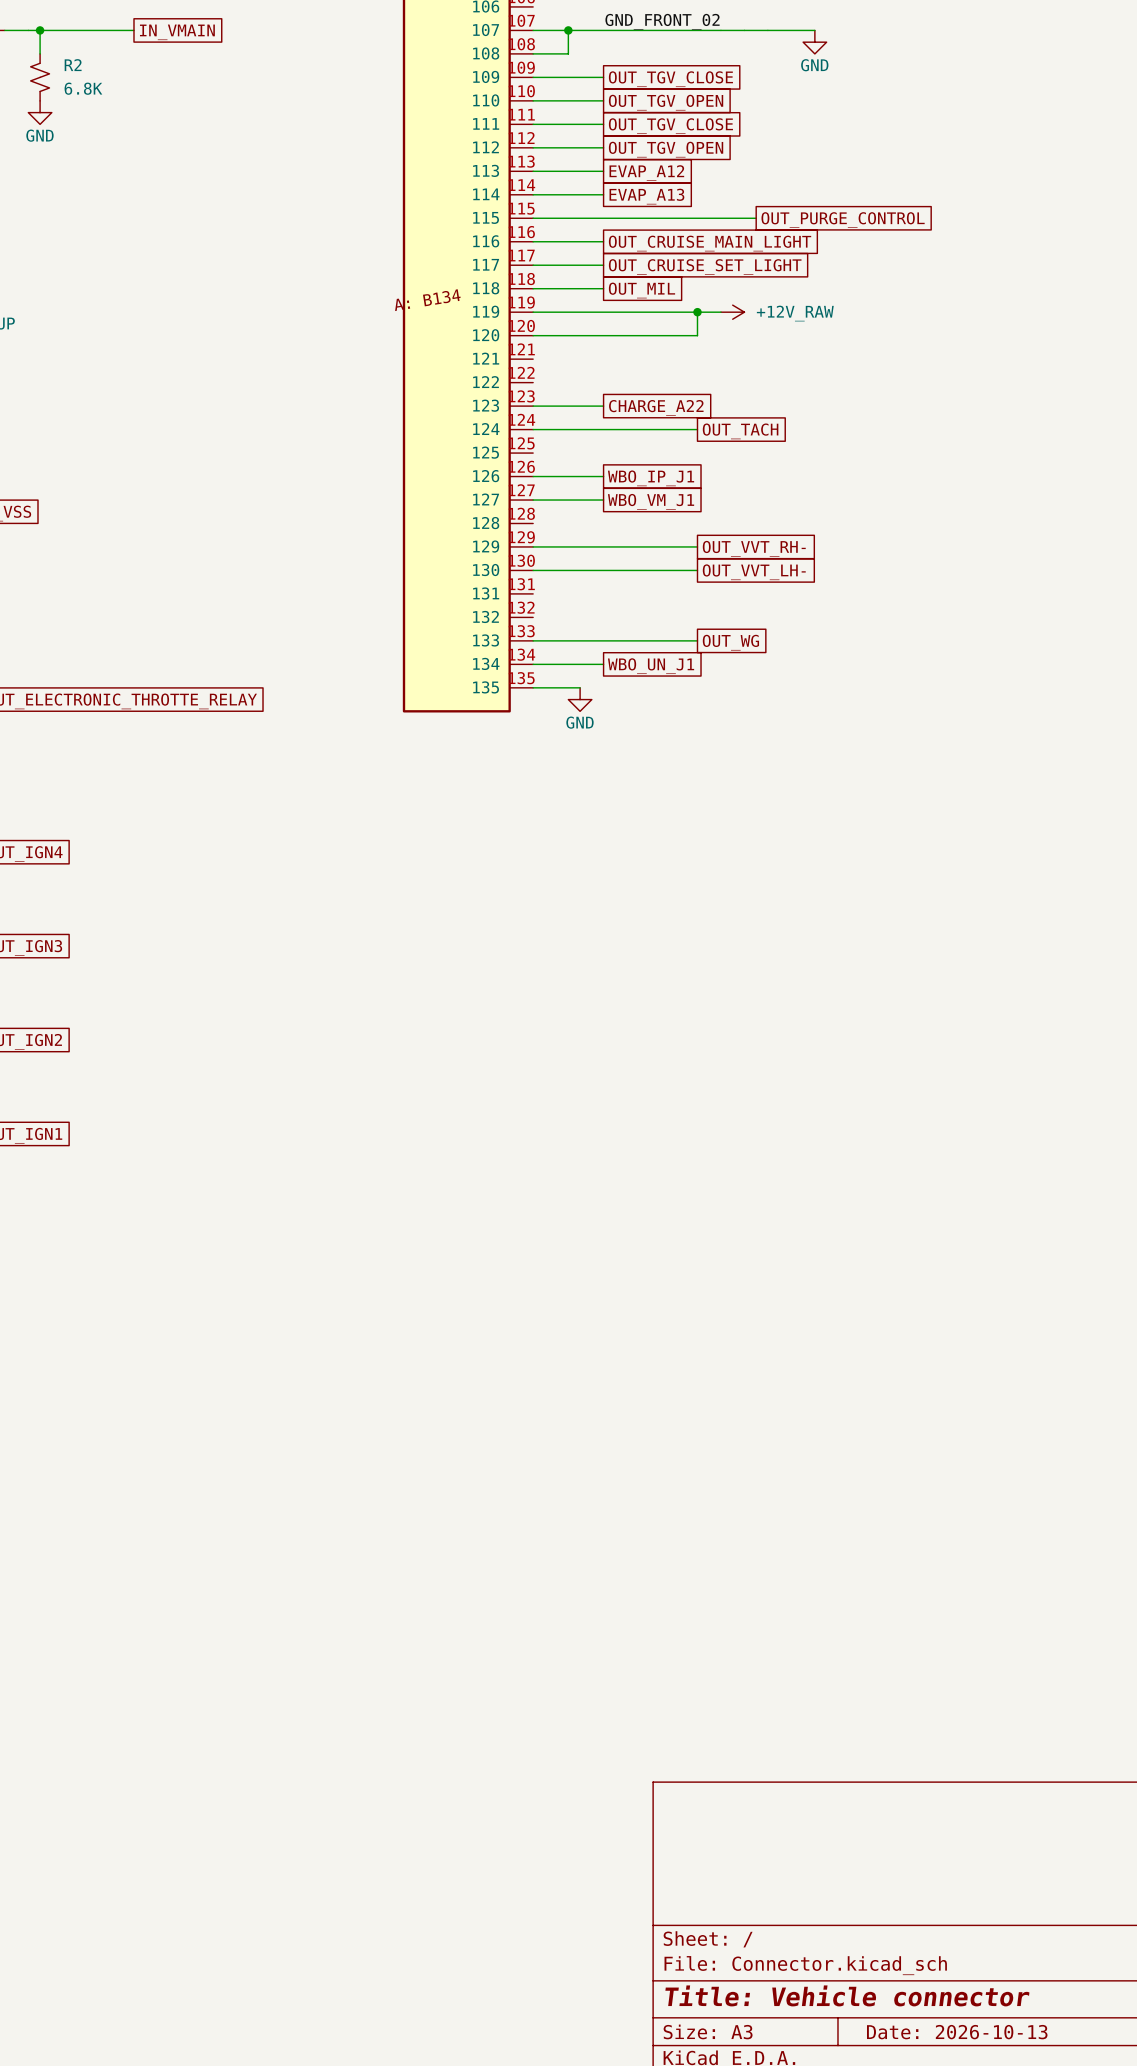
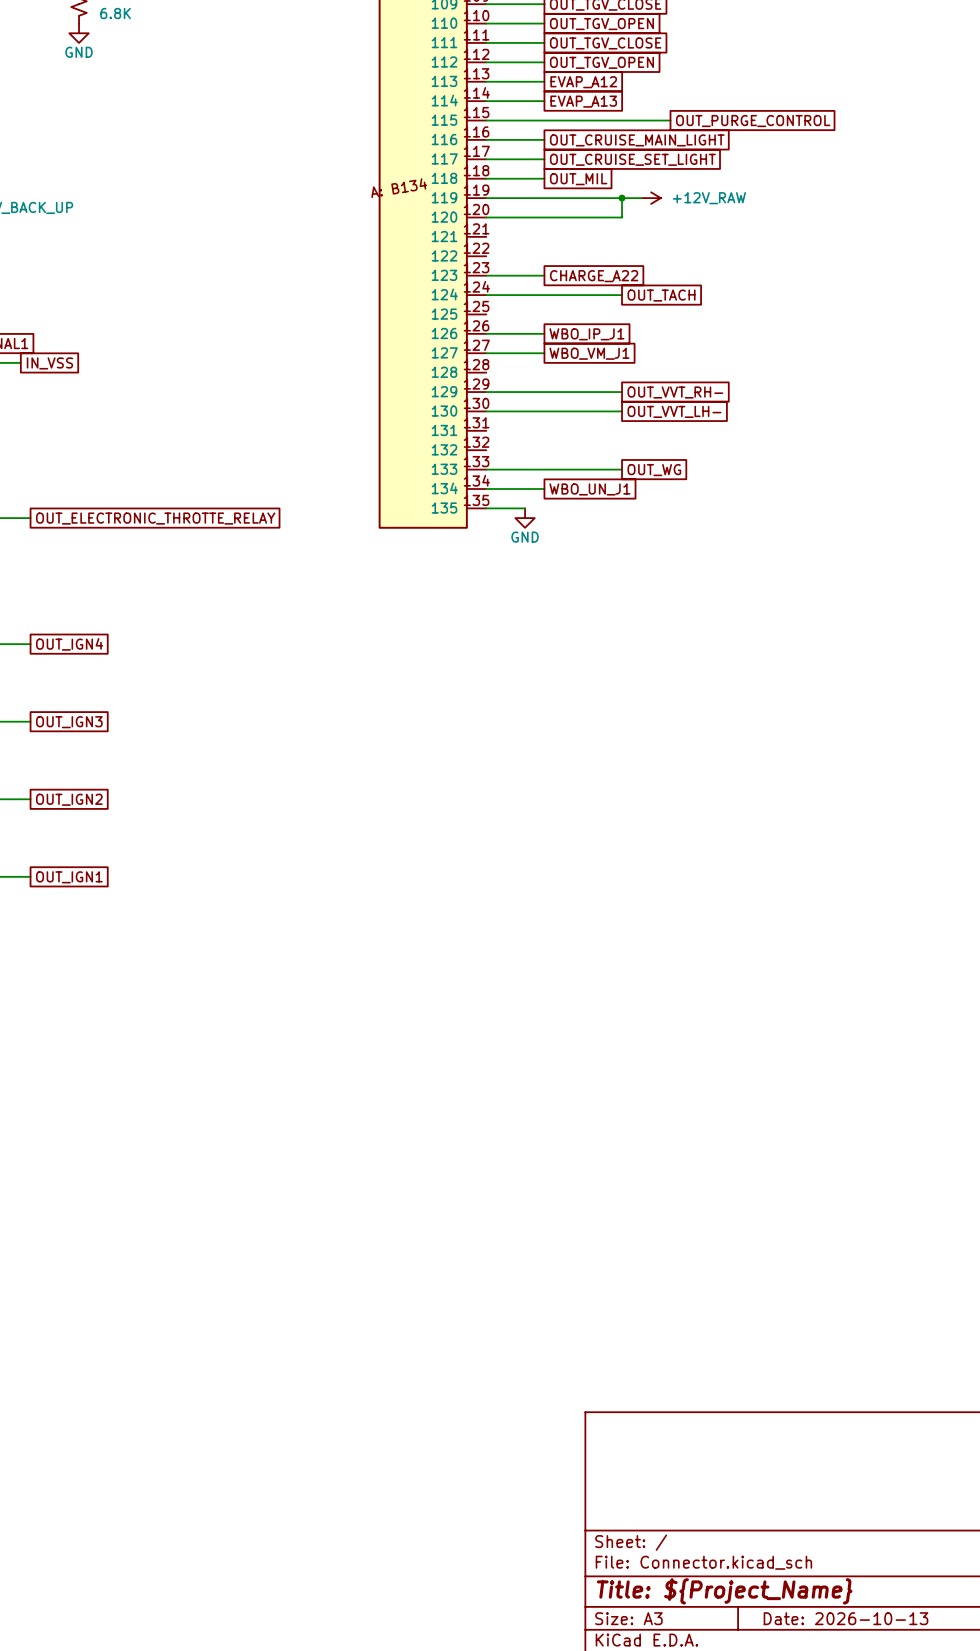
title block: Title: Vehicle connector (847, 1995) -> Title: ${Project_Name} (724, 1591)

